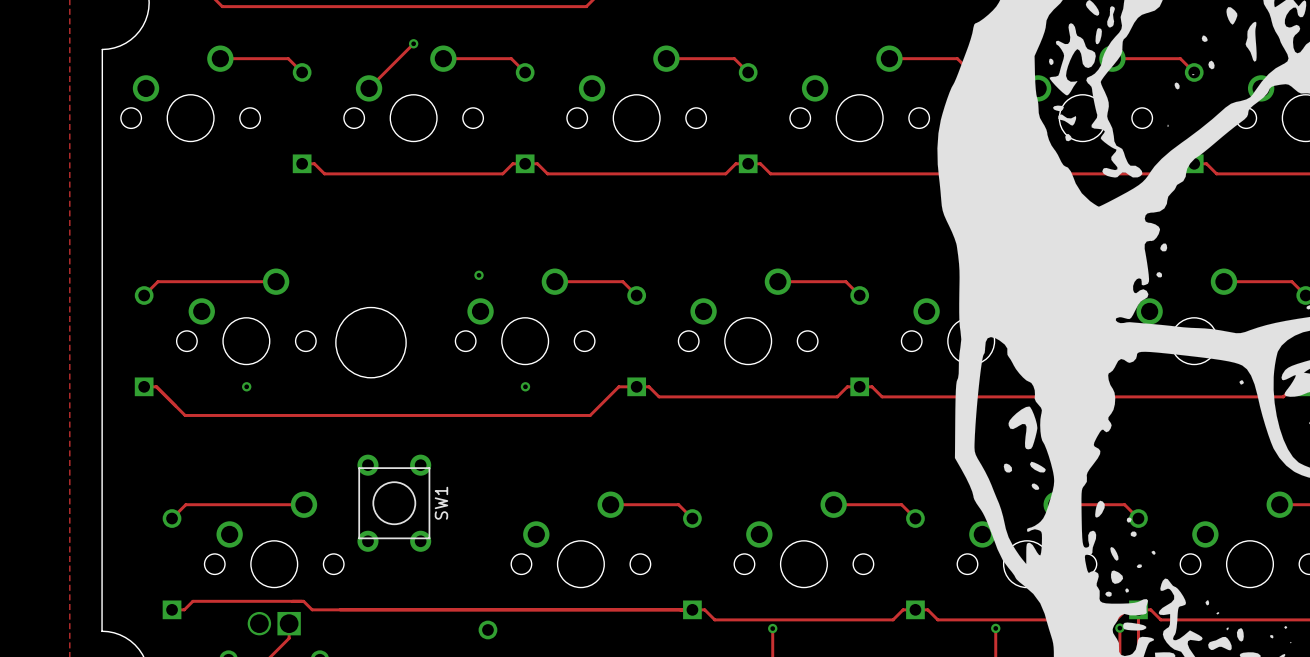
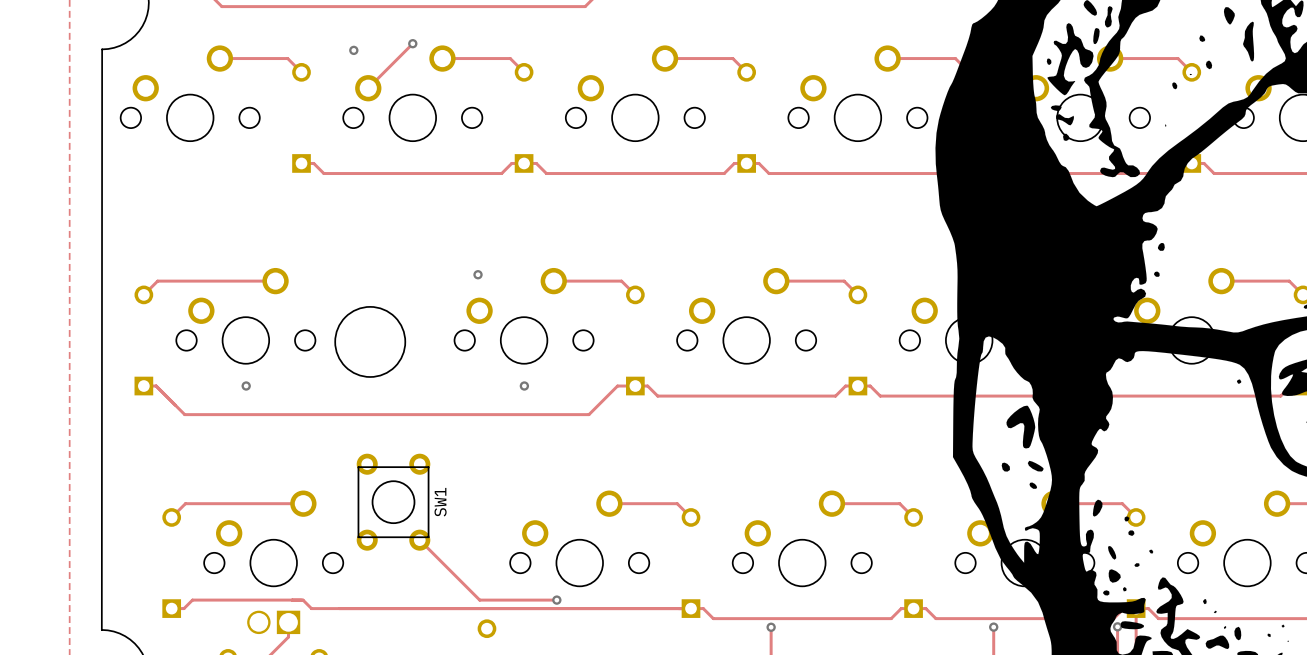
via: none -> (353, 50)
track: none -> (419, 540) (479, 600) (556, 600)
via: none -> (556, 600)

